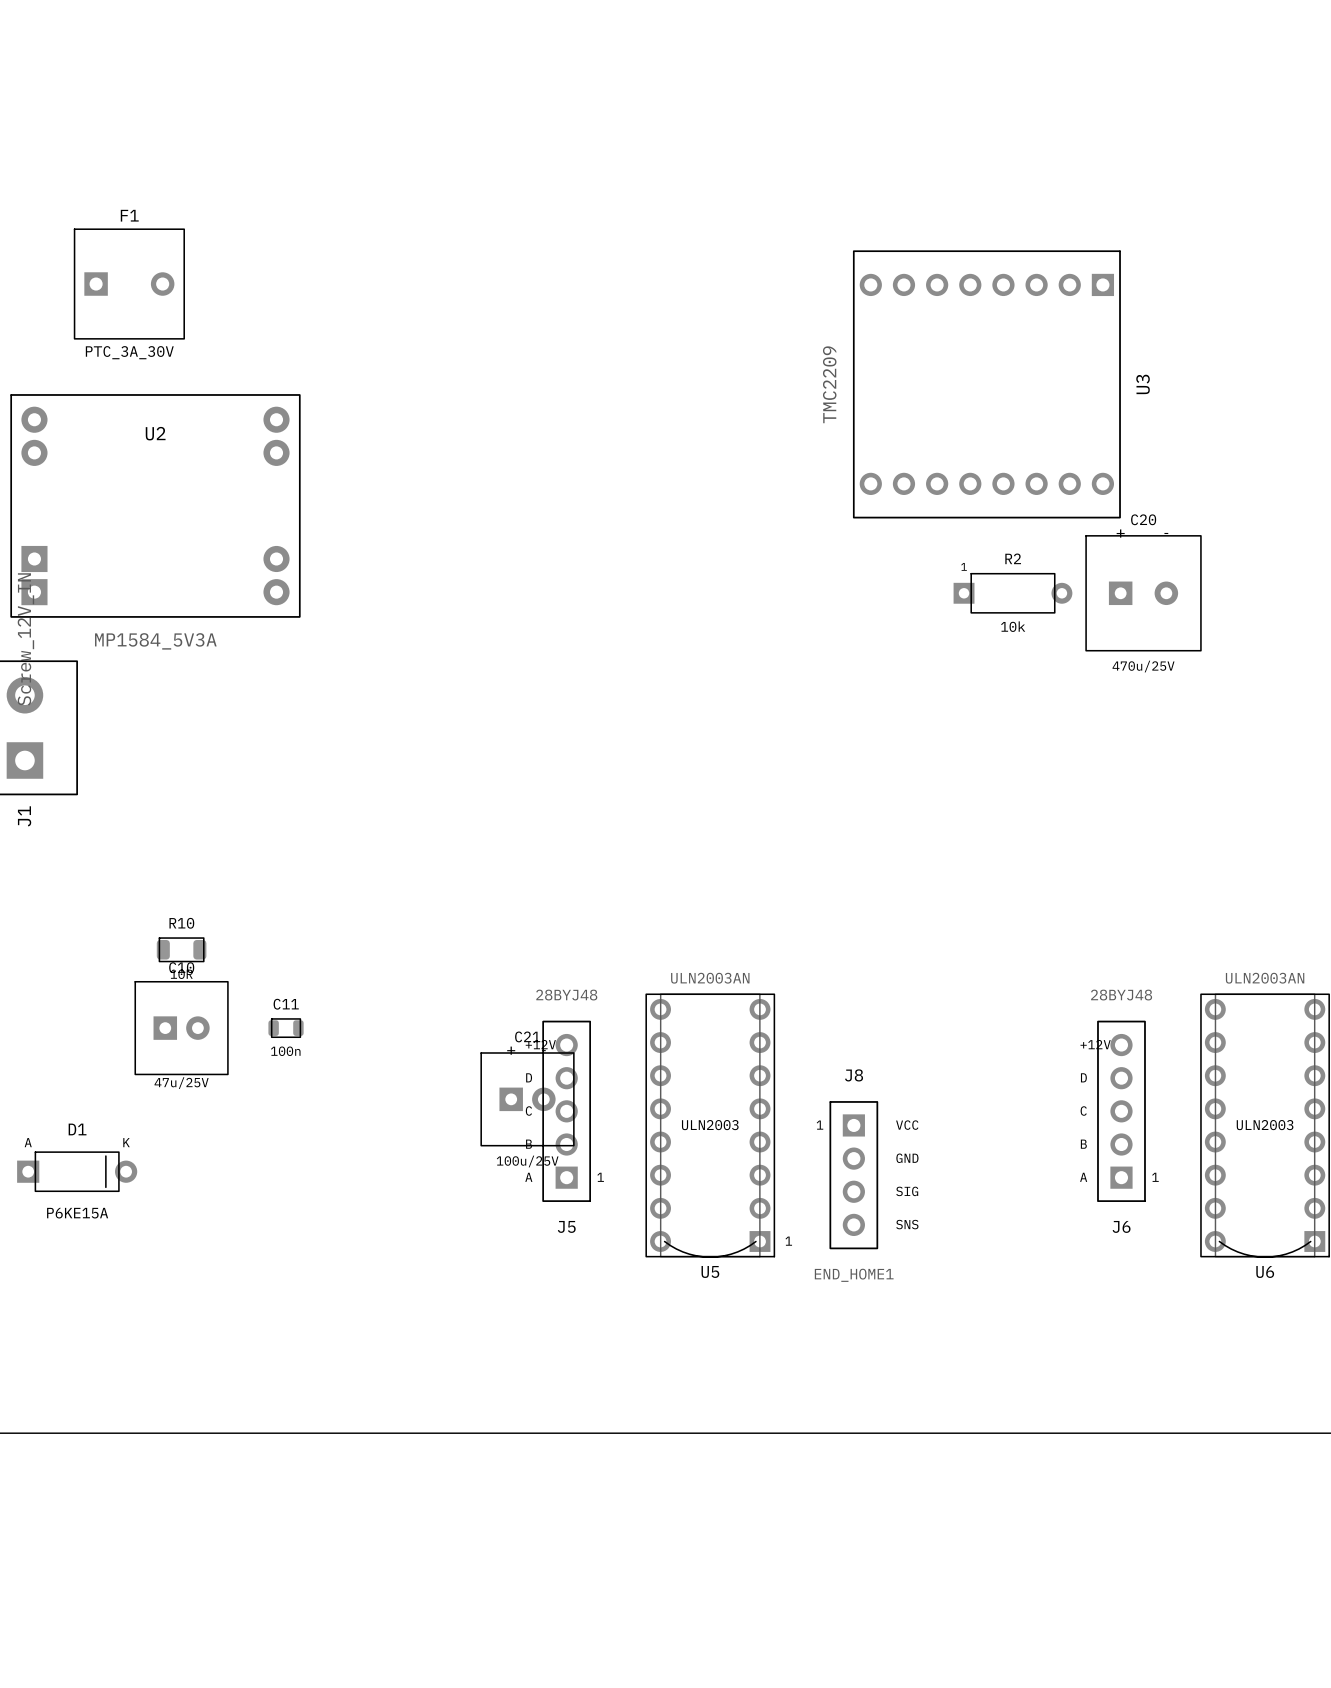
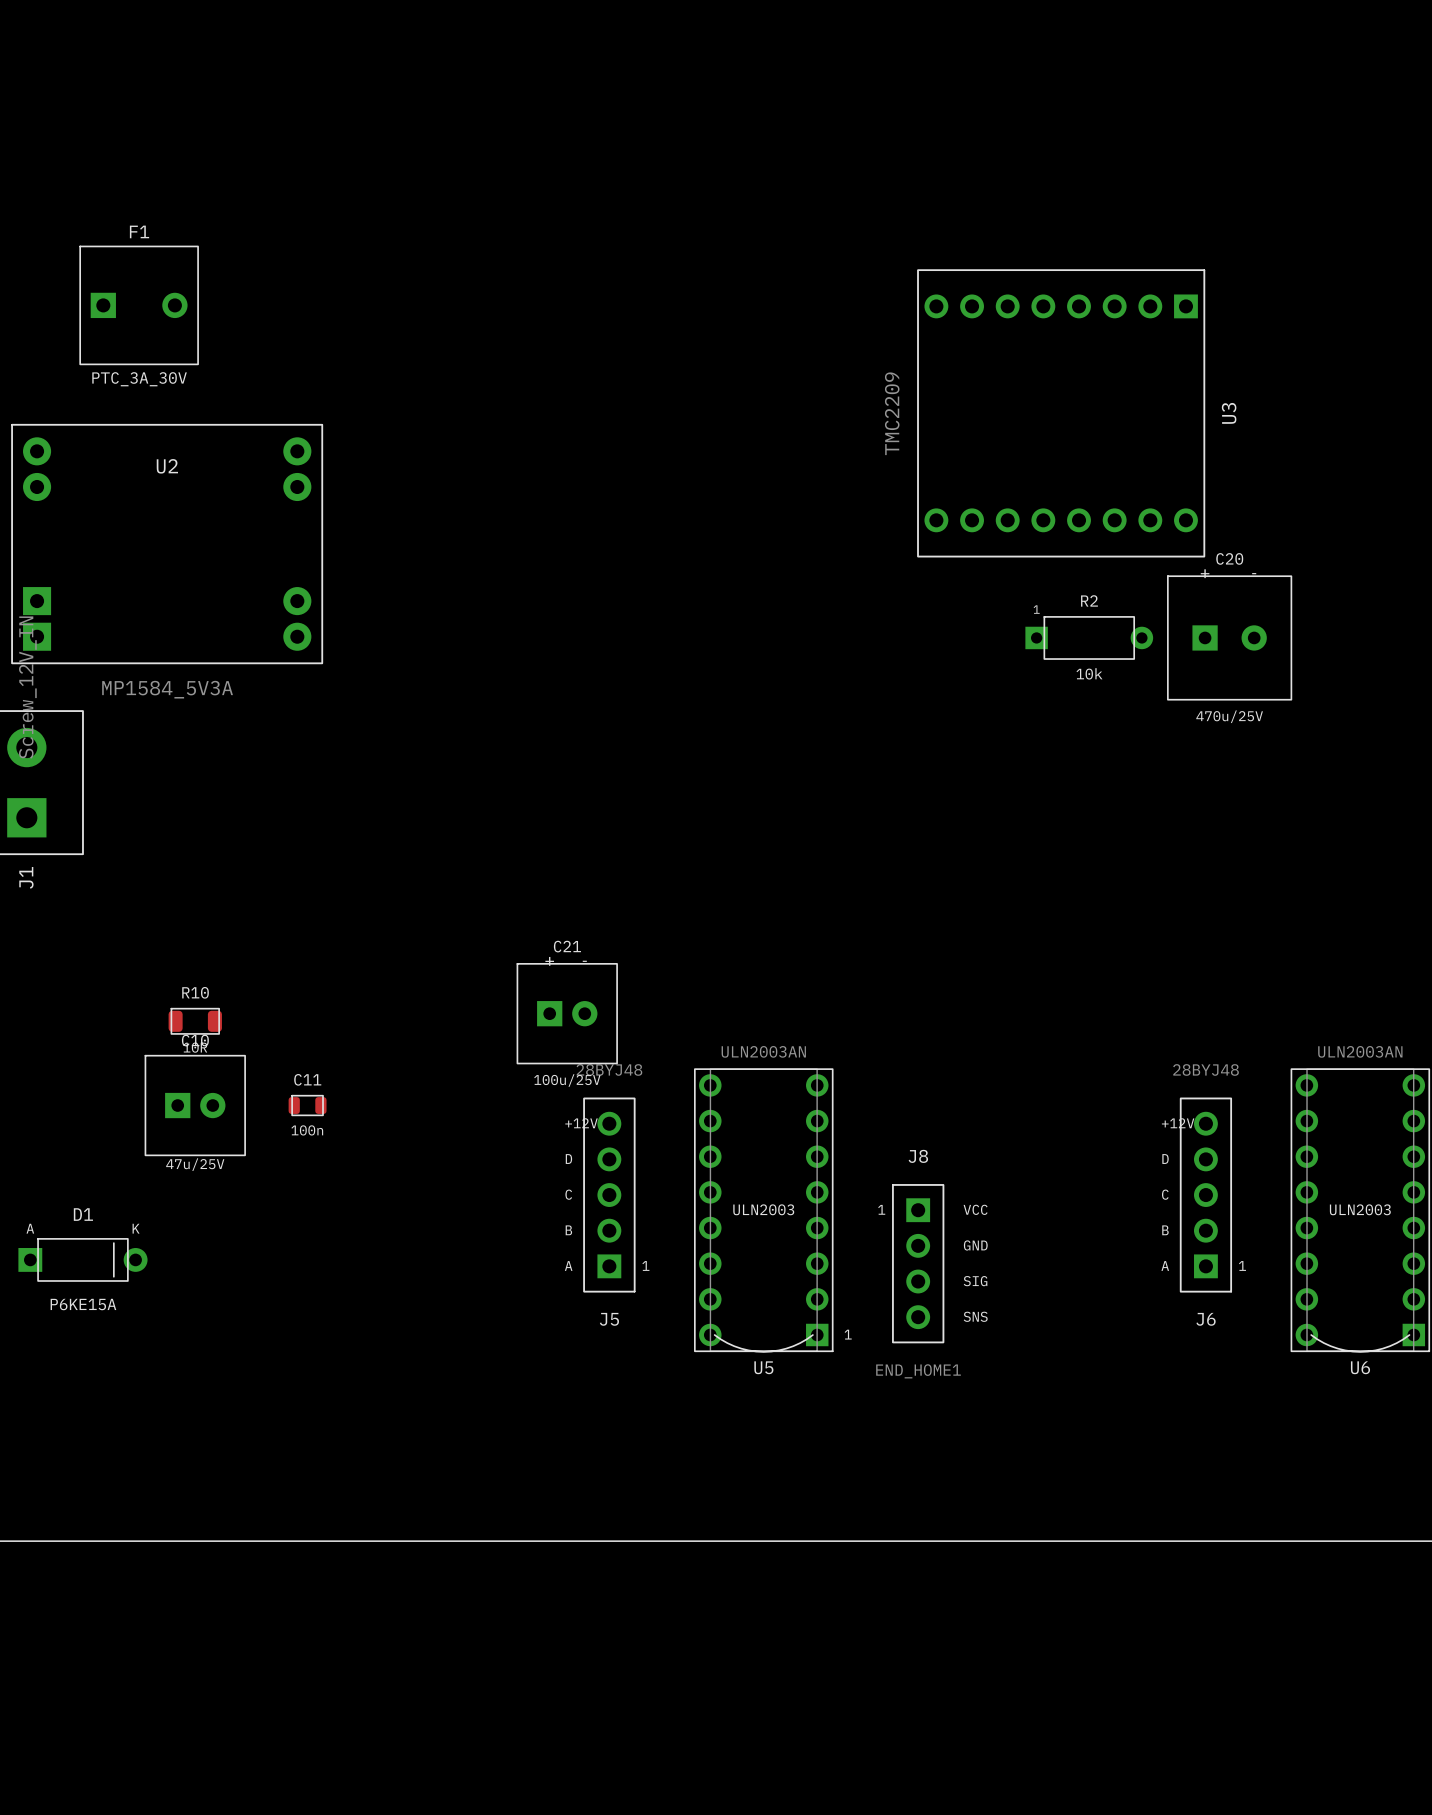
C21 position: (527, 1099) -> (567, 1013)

